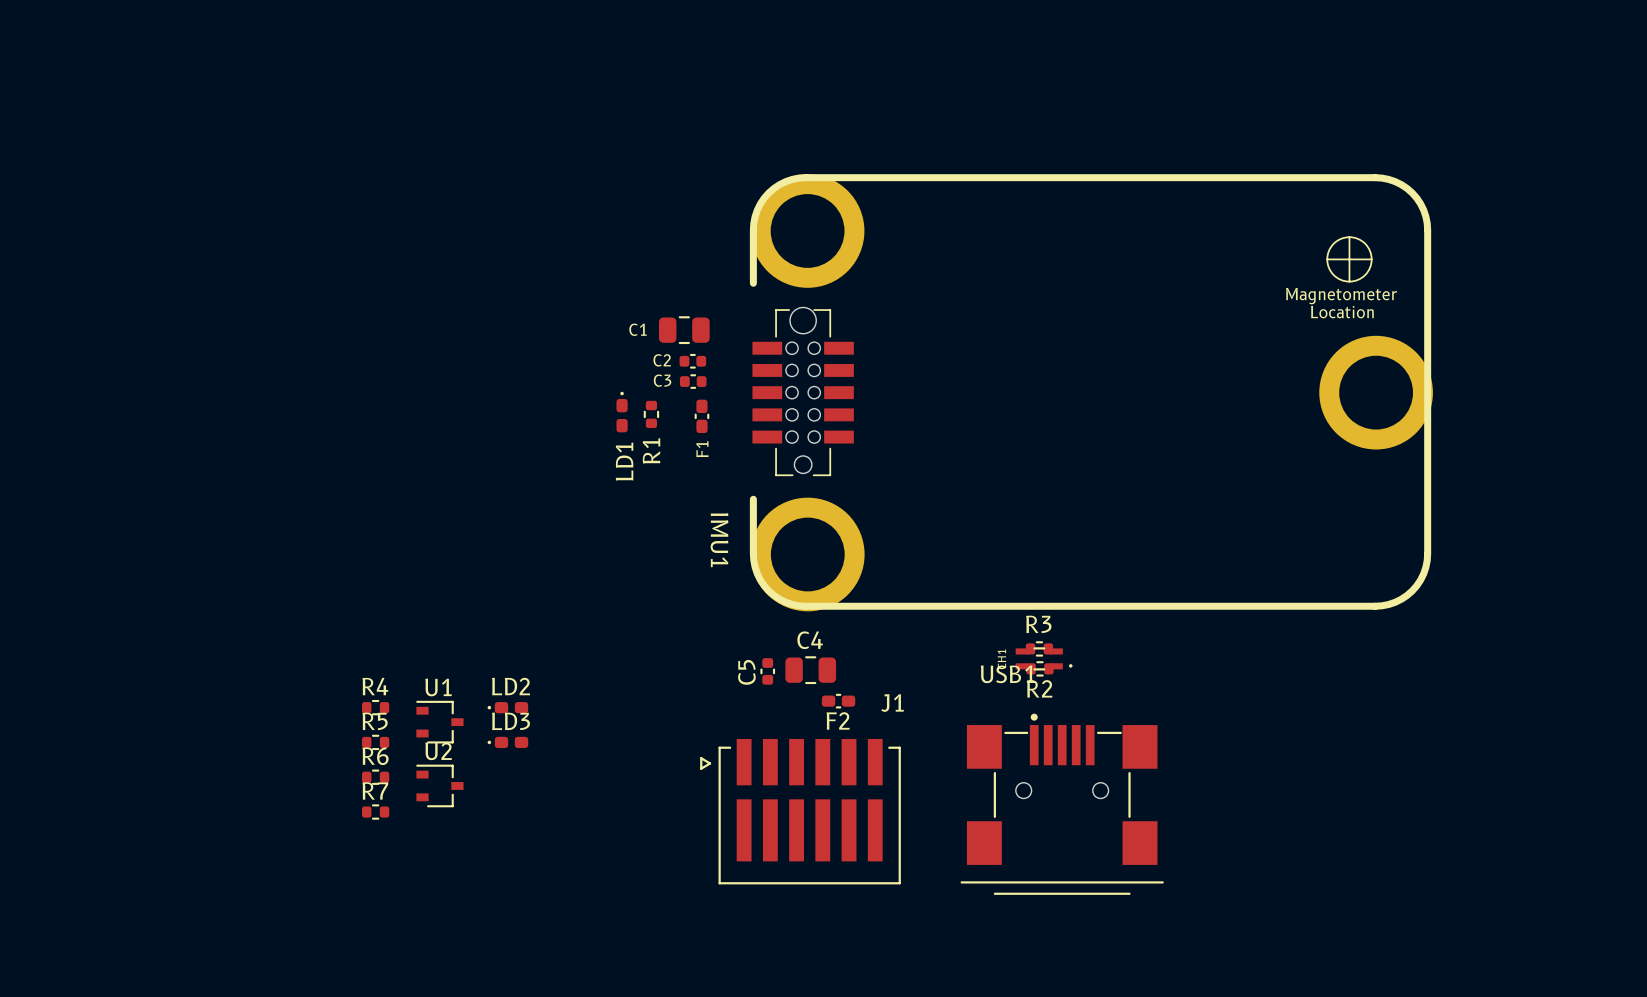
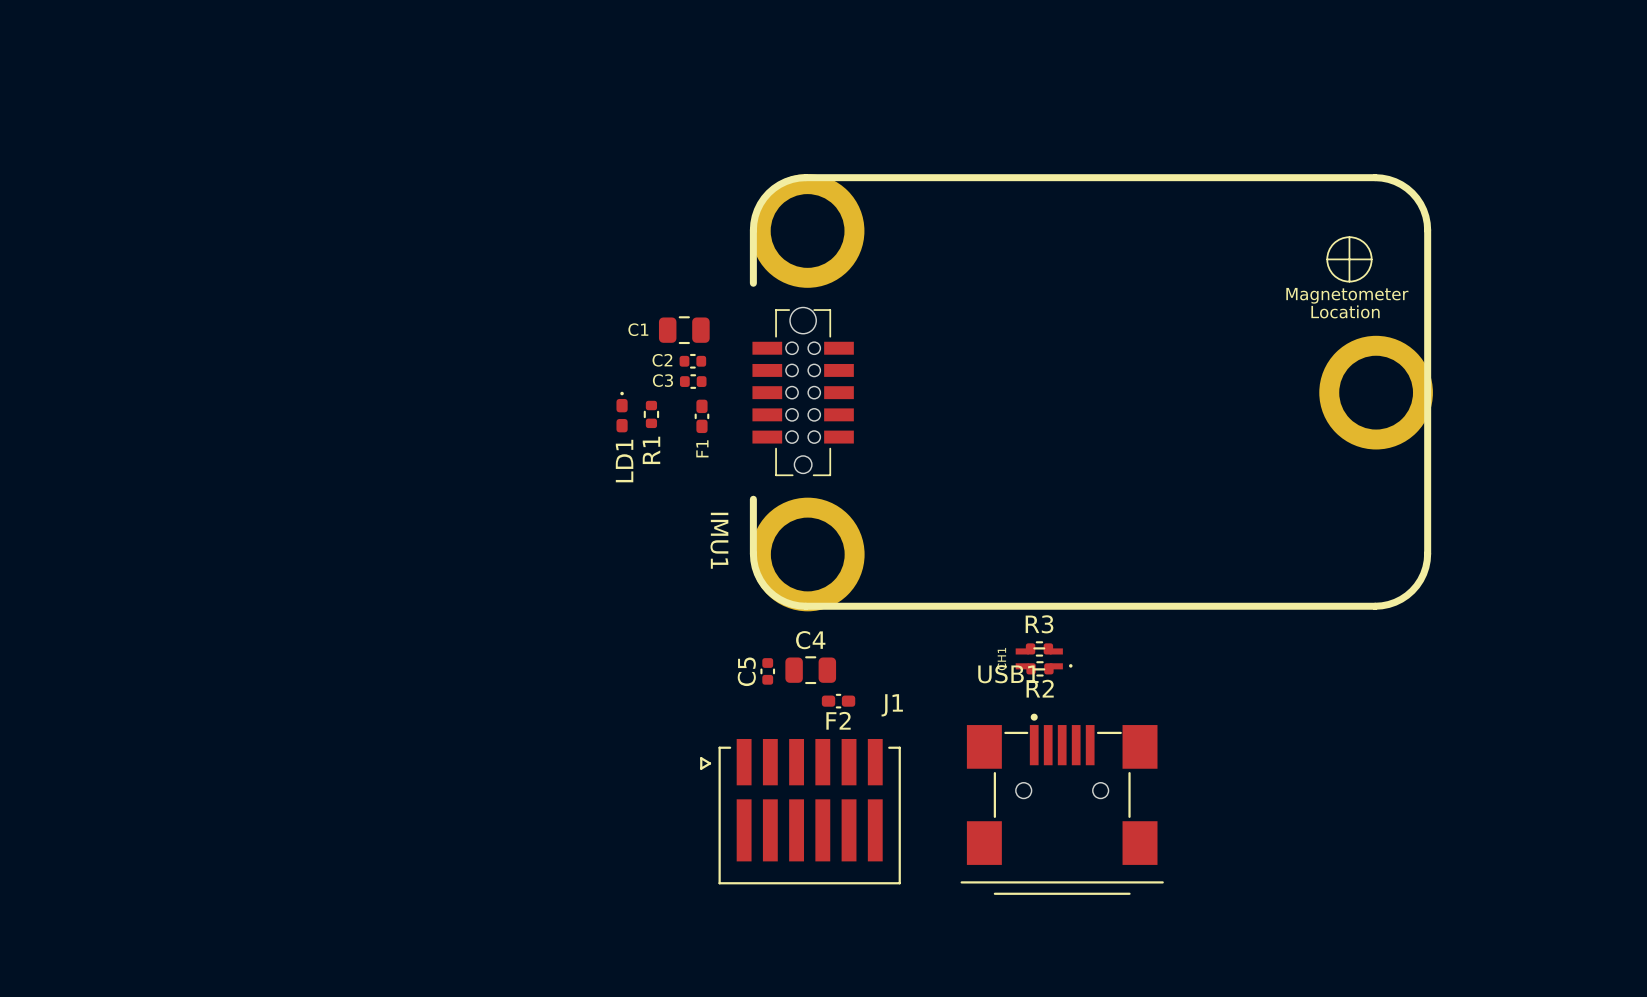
R4: (375, 707) -> none
LD2: (507, 707) -> none
U1: (439, 722) -> none
R5: (375, 742) -> none
LD3: (507, 742) -> none
R6: (375, 777) -> none
U2: (439, 785) -> none
R7: (375, 812) -> none

